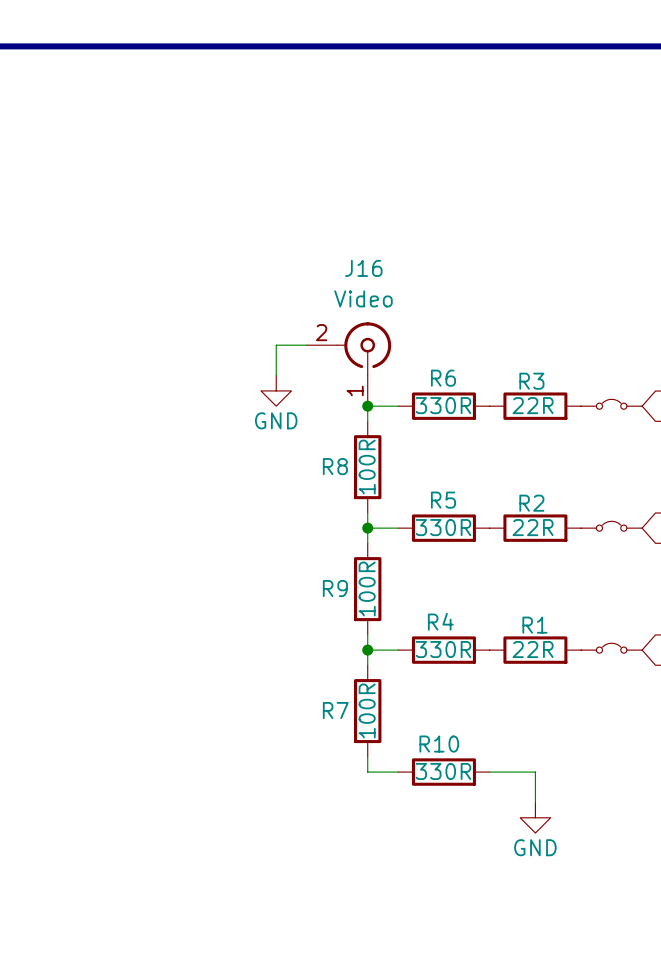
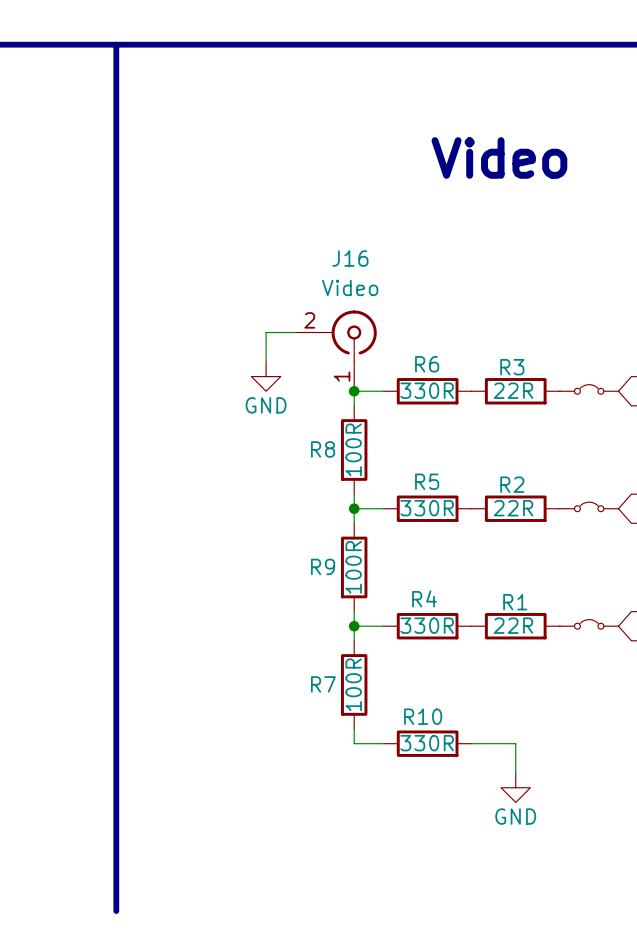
line: none -> (116, 44) (116, 911)
text: none -> Video (499, 157)

